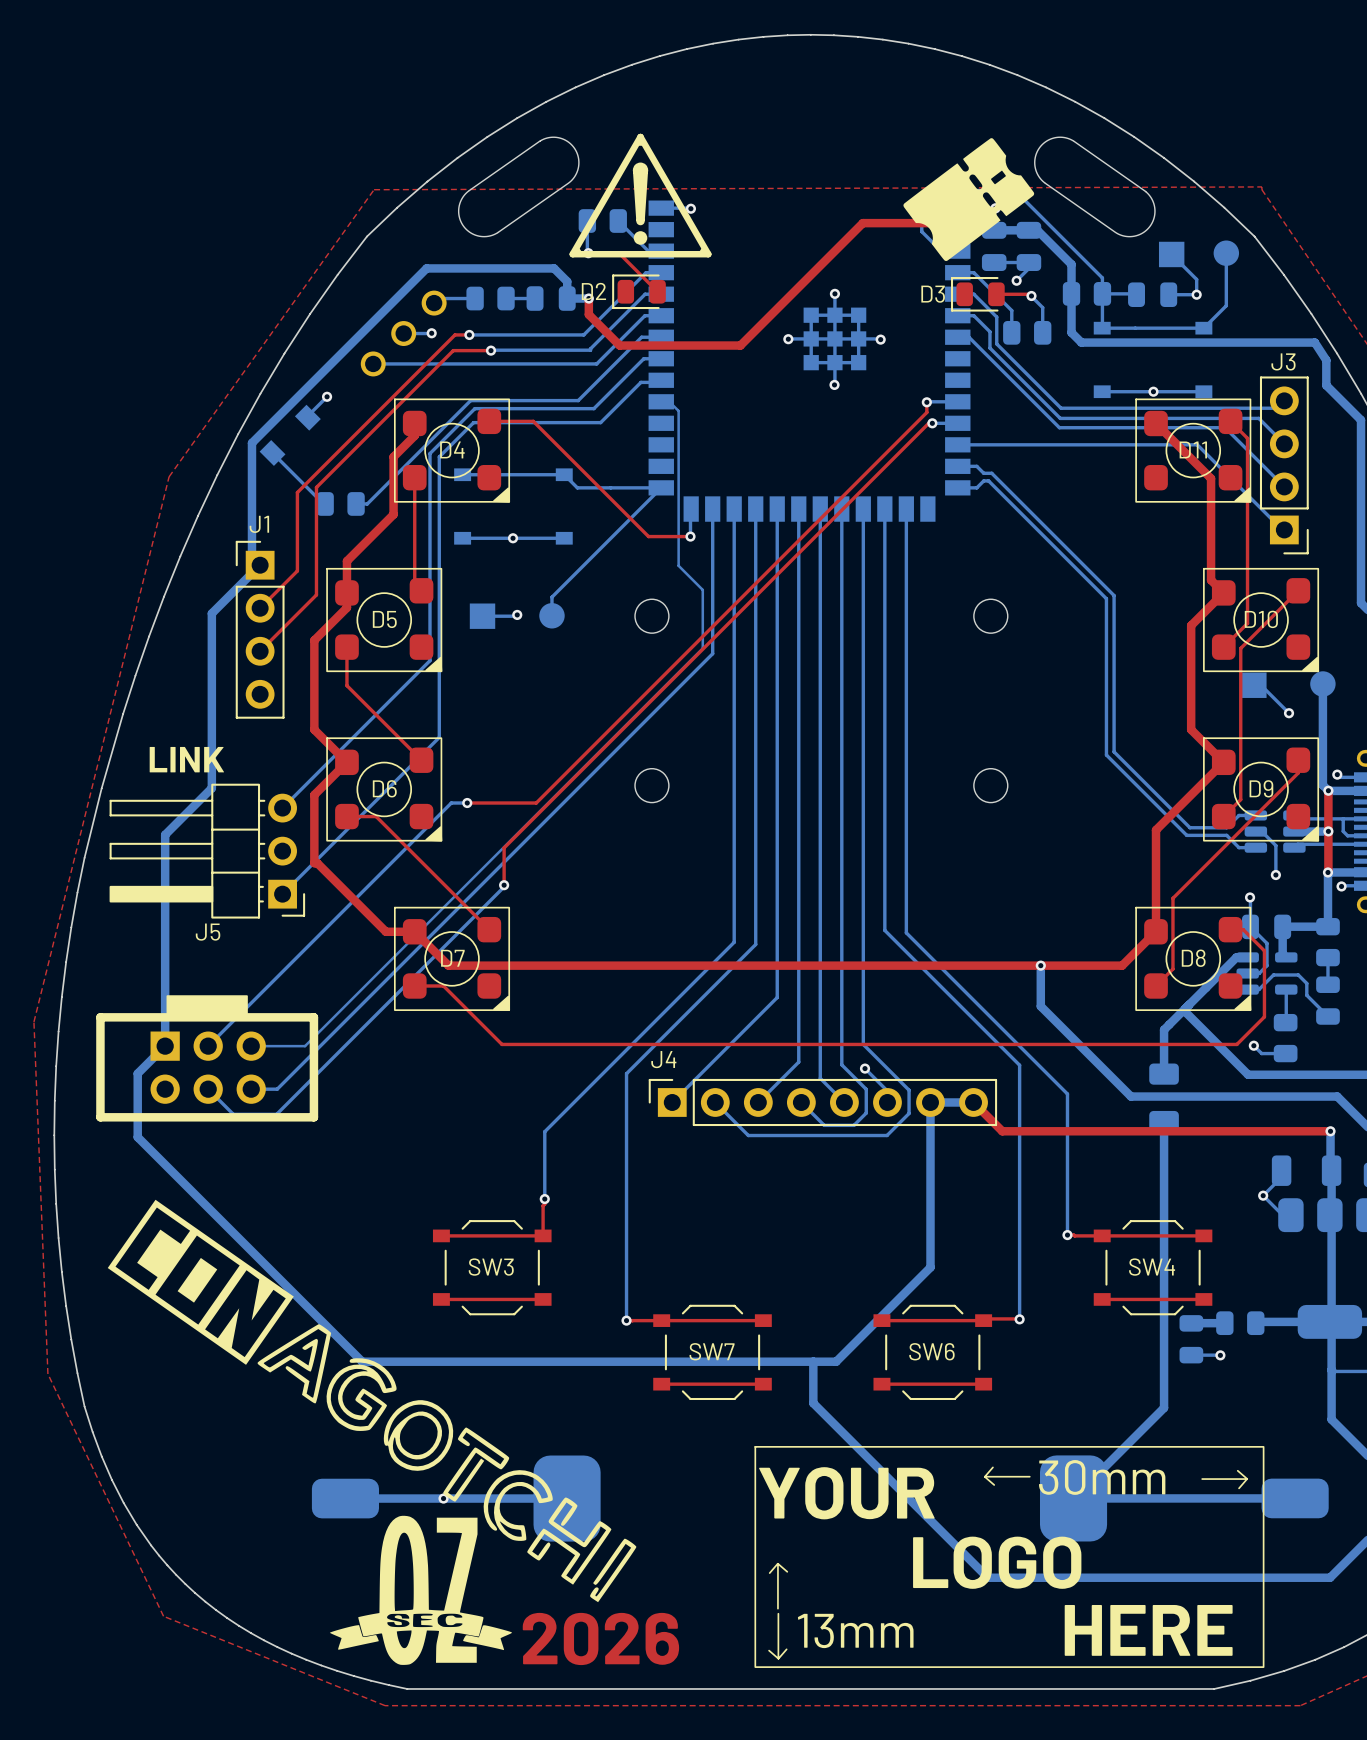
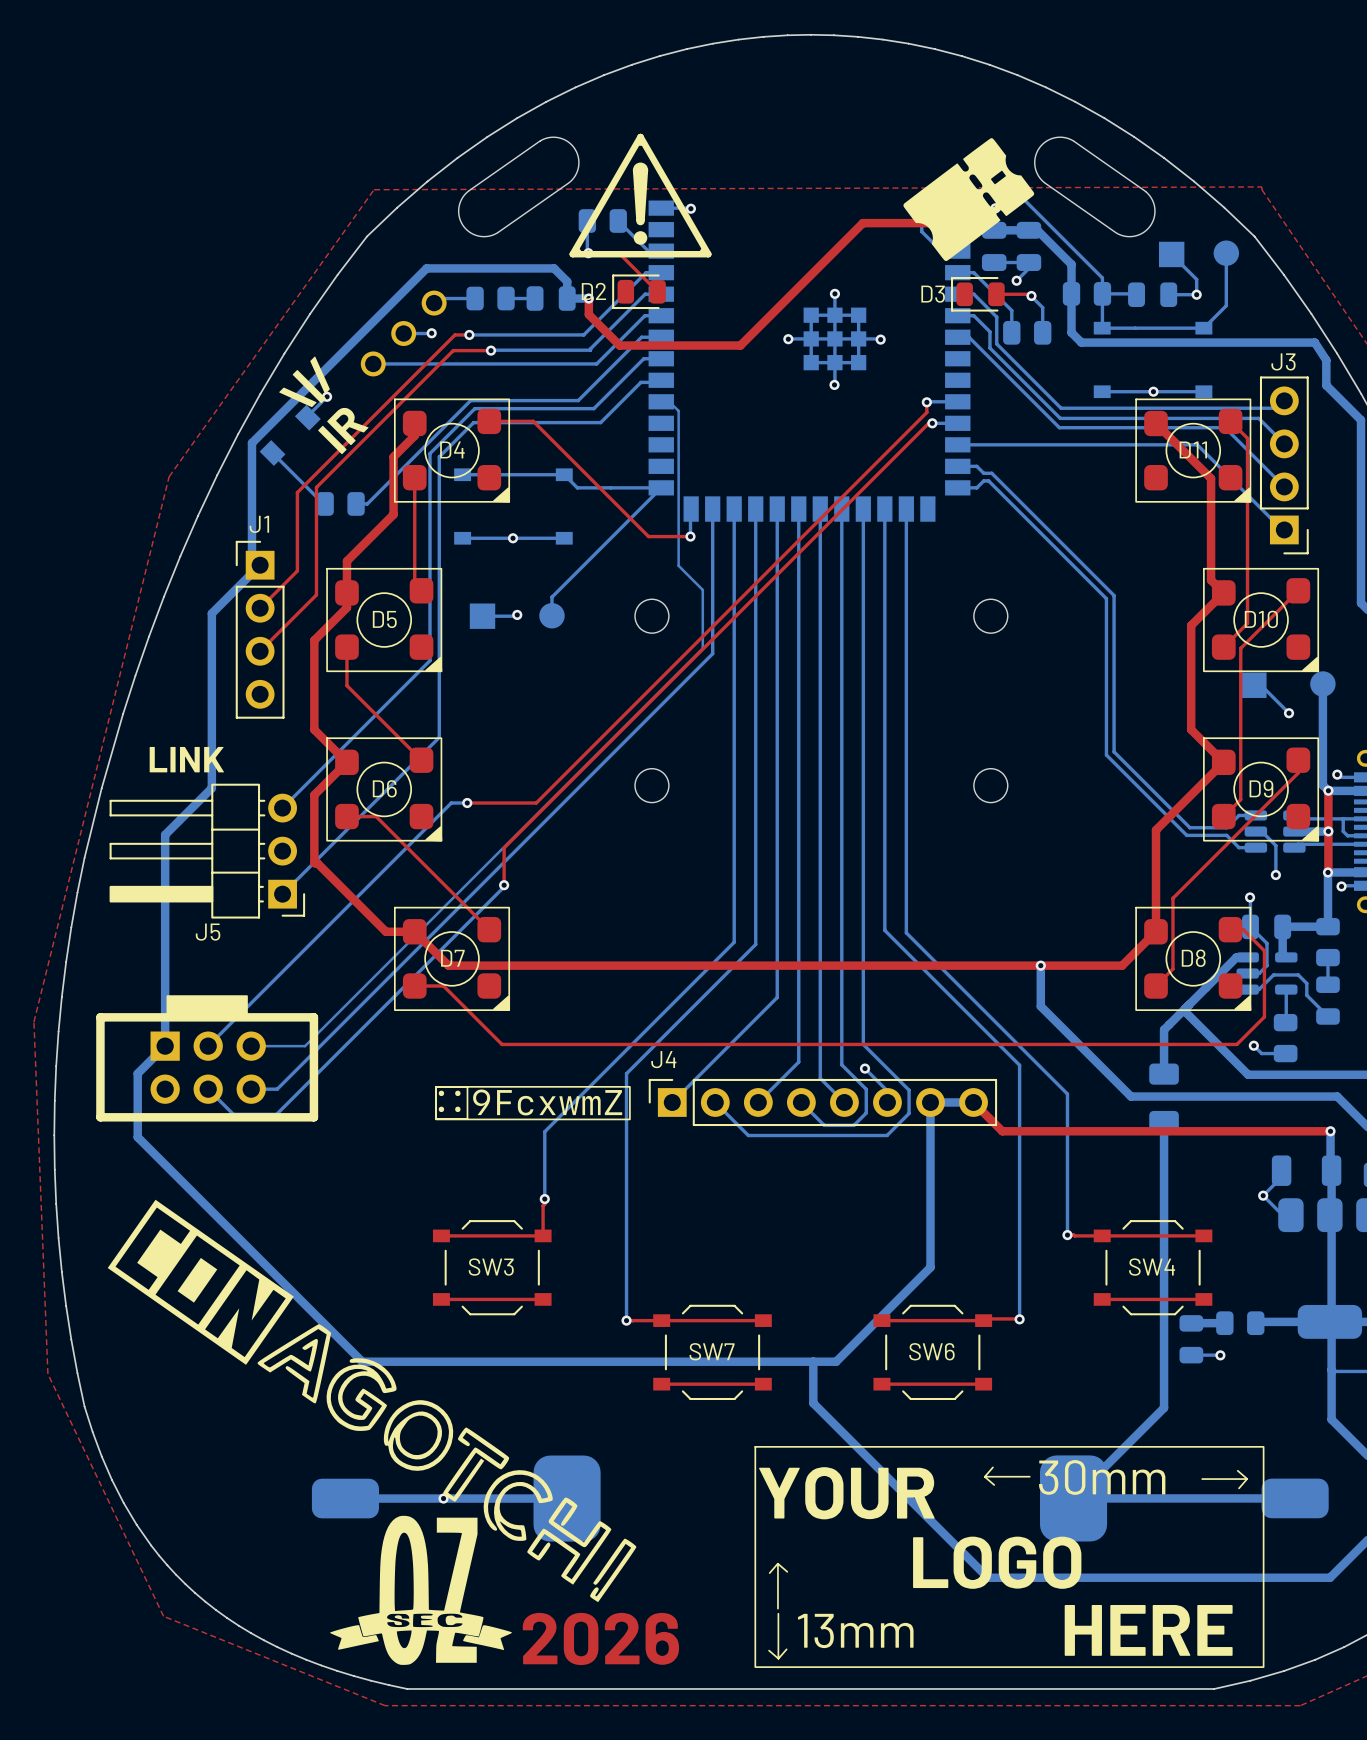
text: none -> \|/ (304, 381)
text: none -> IR (343, 430)
drawing: none -> [435, 1086, 631, 1121]

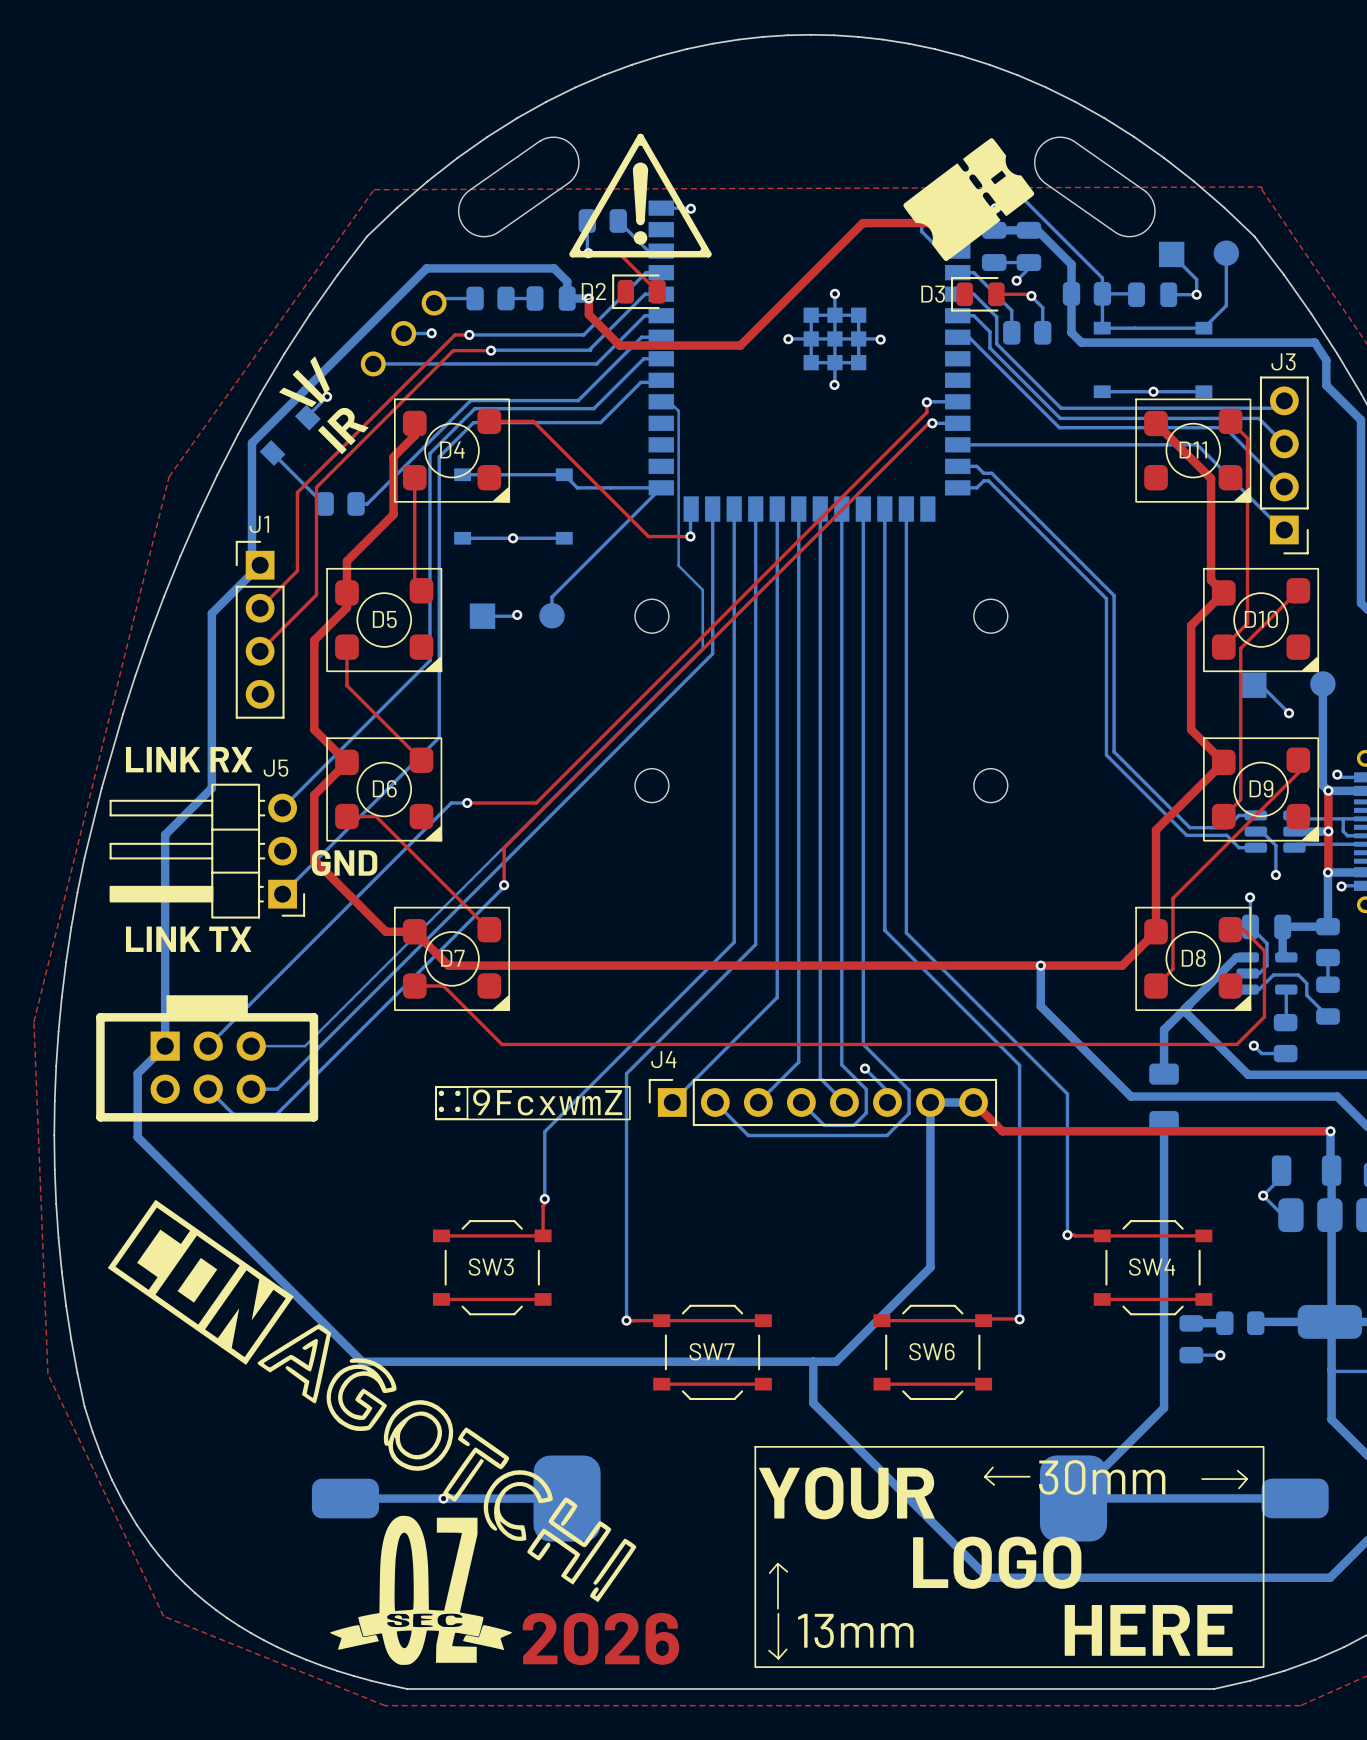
text: LINK (186, 759) -> LINK RX (189, 759)
text: none -> GND (344, 863)
J5 name position: J5 (208, 932) -> J5 (275, 768)
text: none -> LINK TX (188, 939)

